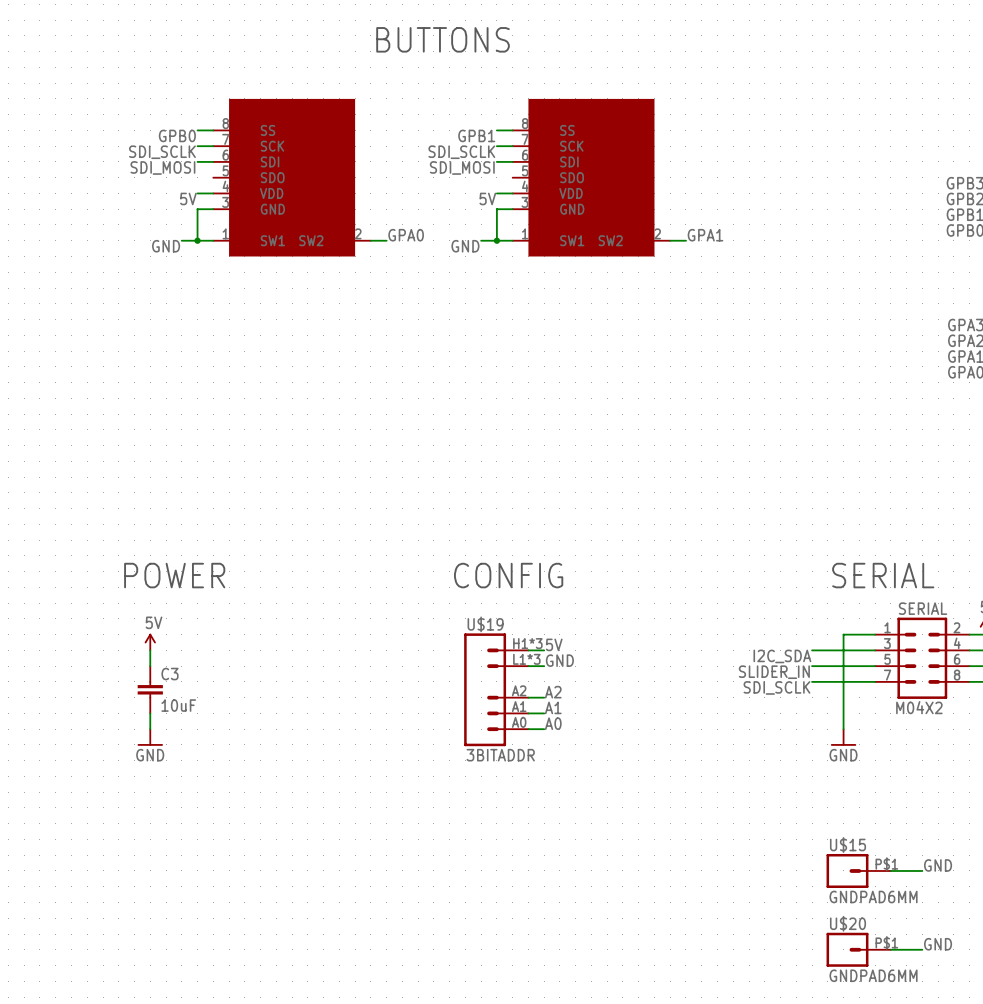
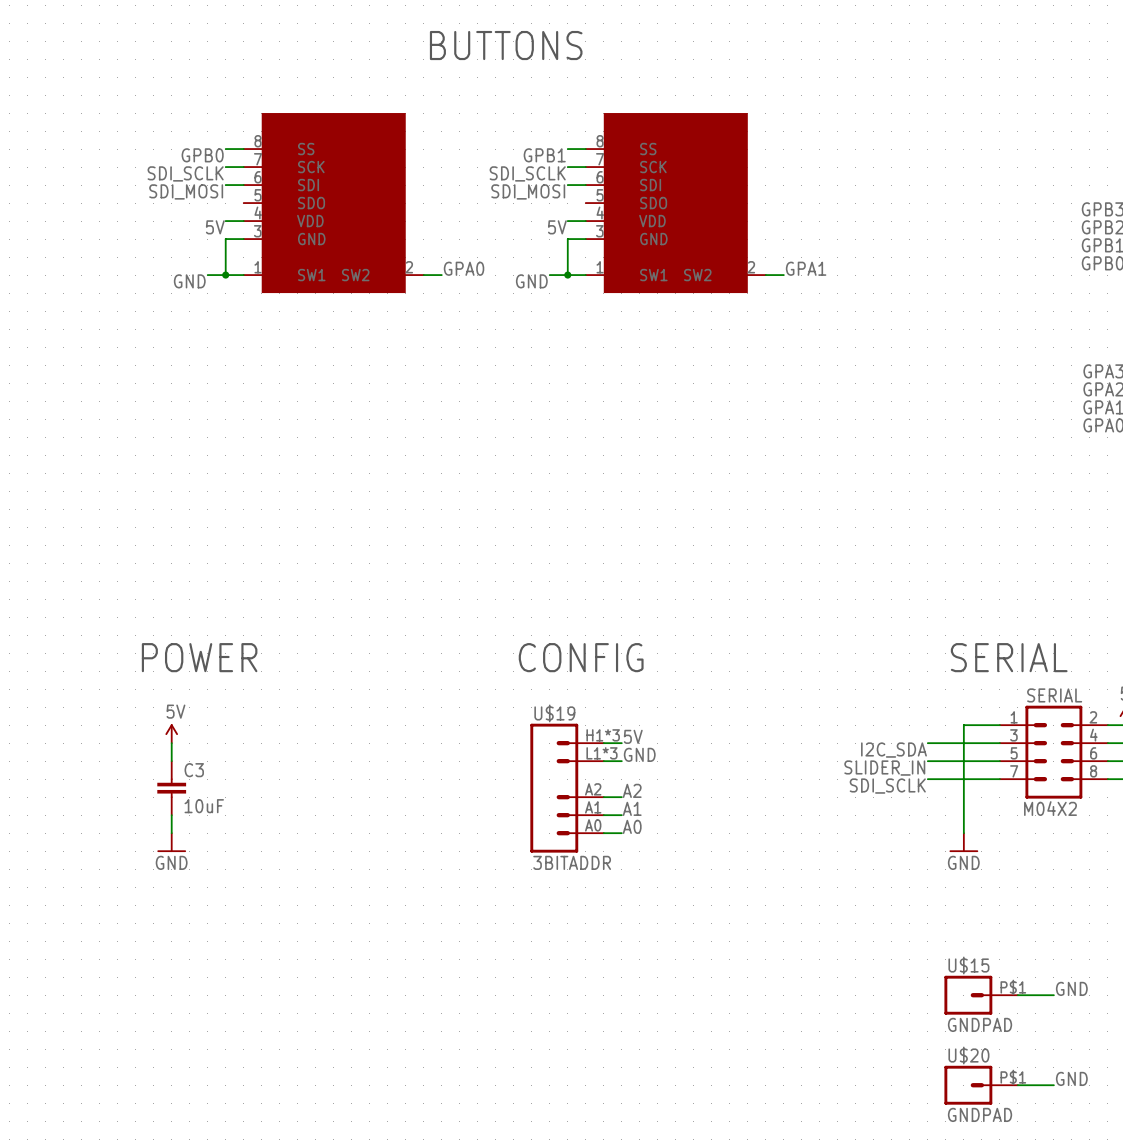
U$15 value: GNDPAD6MM (873, 896) -> GNDPAD (980, 1024)
U$20 value: GNDPAD6MM (873, 975) -> GNDPAD (980, 1114)

